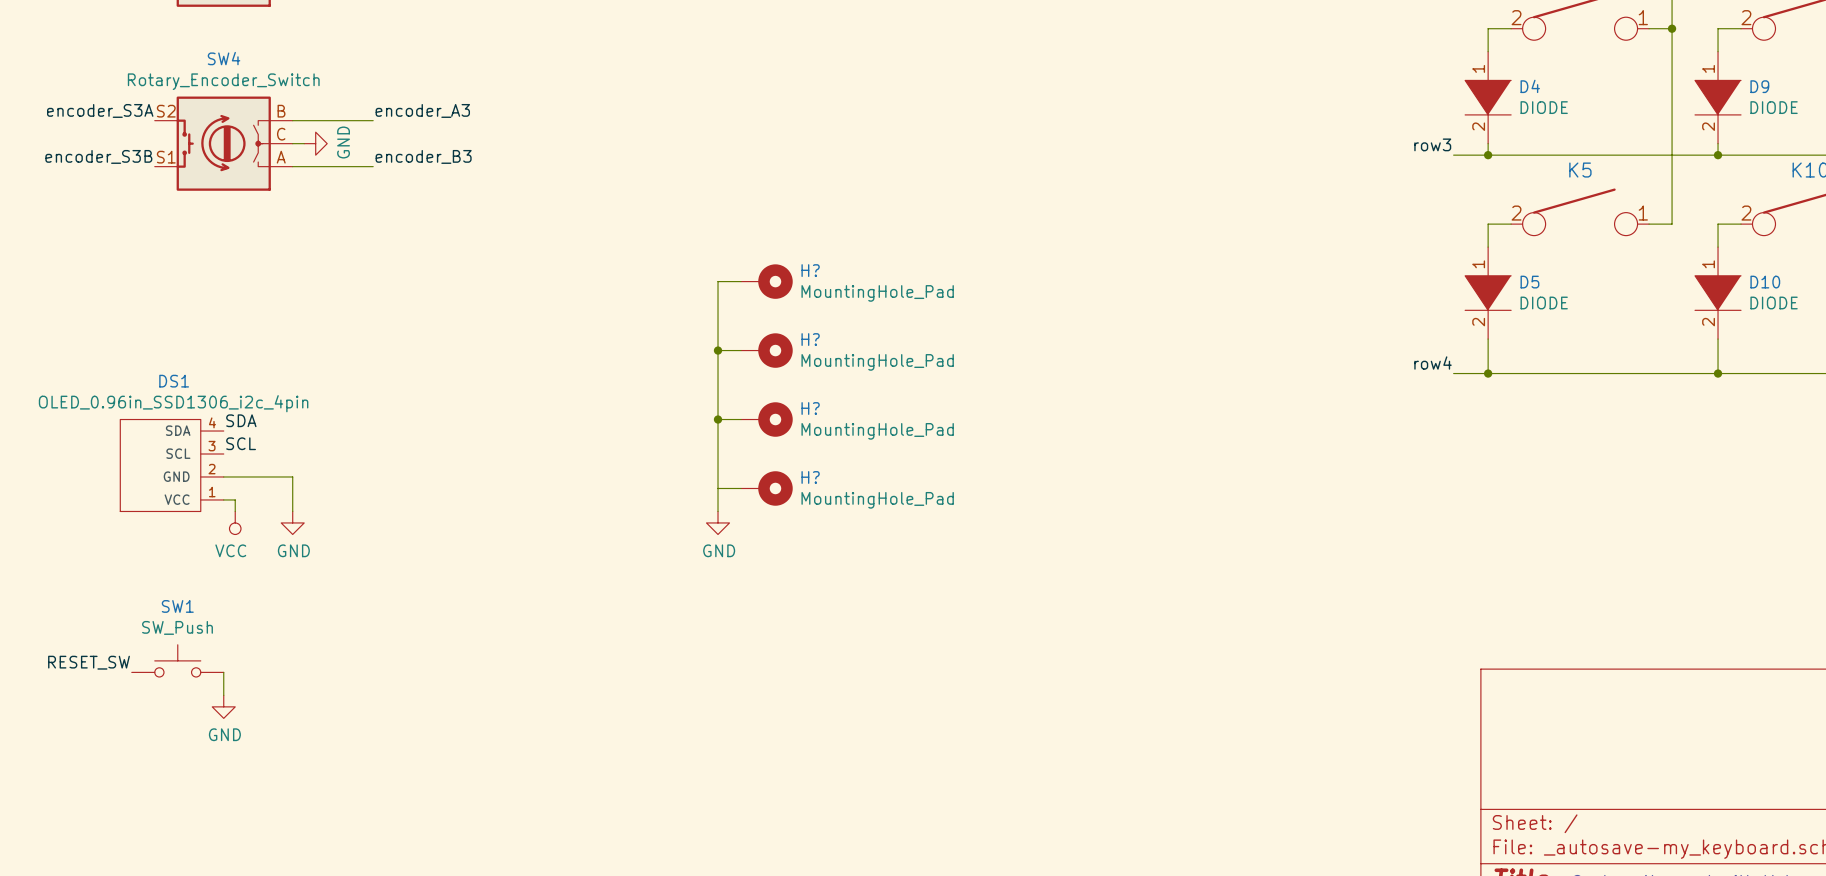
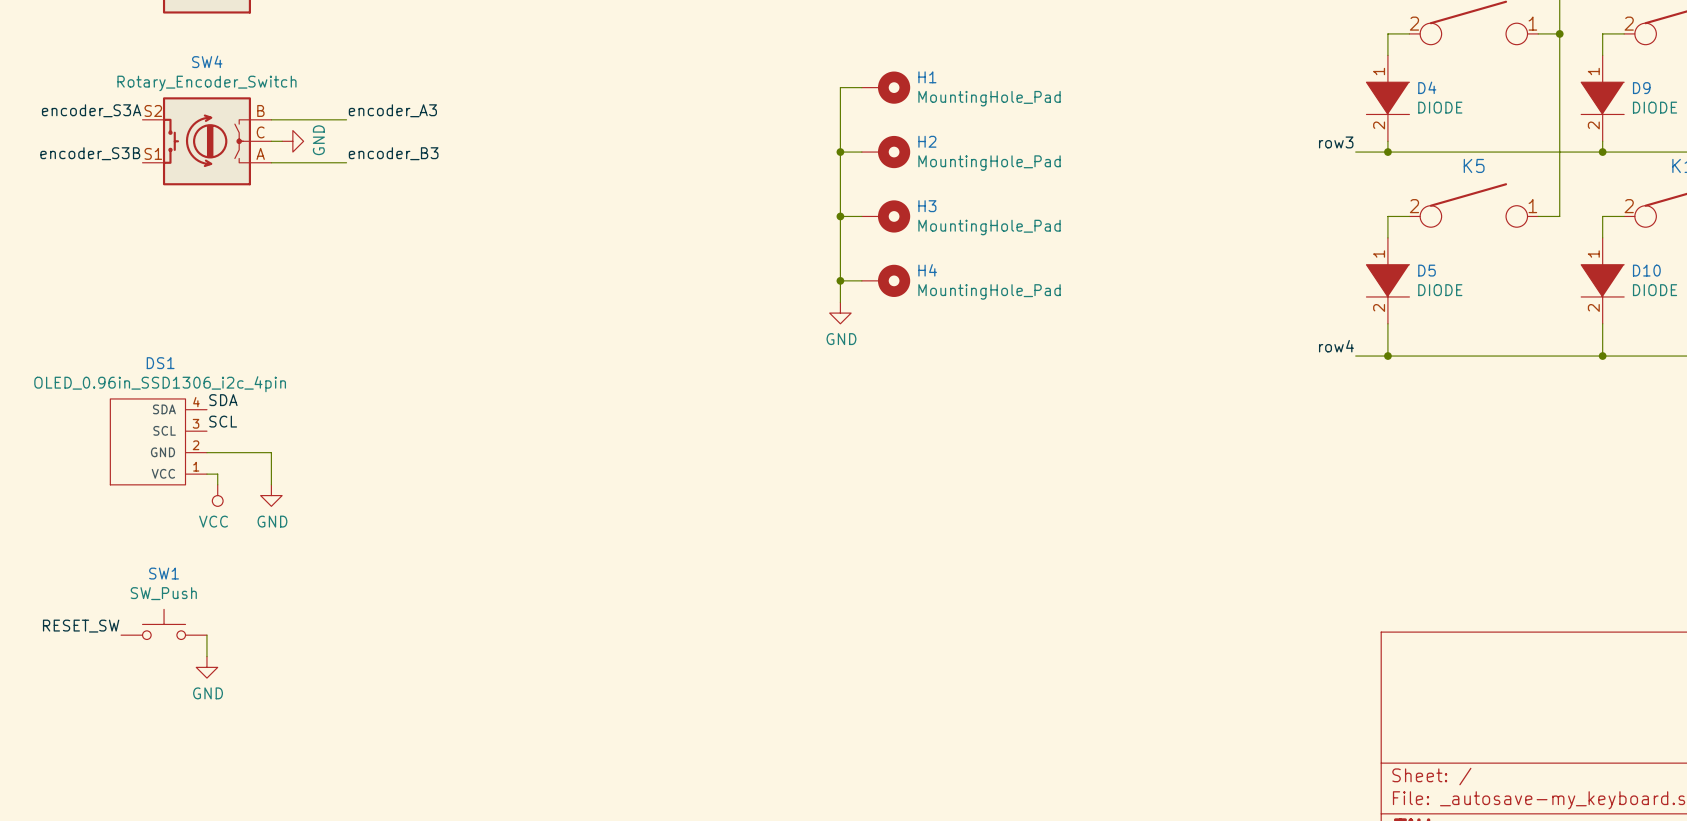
wire: none -> (861, 87) (840, 87) (840, 302)
H1: none -> MountingHole_Pad (886, 87)
wire: none -> (840, 152) (861, 152)
junction: none -> (840, 152)
H2: none -> MountingHole_Pad (886, 152)
junction: none -> (840, 216)
H3: none -> MountingHole_Pad (886, 216)
wire: (740, 281) (718, 281) (718, 511) -> none
H?: MountingHole_Pad (766, 281) -> none
junction: none -> (840, 280)
H4: none -> MountingHole_Pad (886, 280)
power symbol: none -> GND (840, 313)
wire: (718, 350) (740, 350) -> (840, 216) (861, 216)
junction: (718, 350) -> none
H?: MountingHole_Pad (766, 350) -> none
wire: (718, 419) (740, 419) -> (840, 280) (861, 280)
junction: (718, 419) -> none
H?: MountingHole_Pad (766, 419) -> none
wire: (718, 488) (740, 488) -> none
H?: MountingHole_Pad (766, 488) -> none
power symbol: GND (718, 522) -> none

